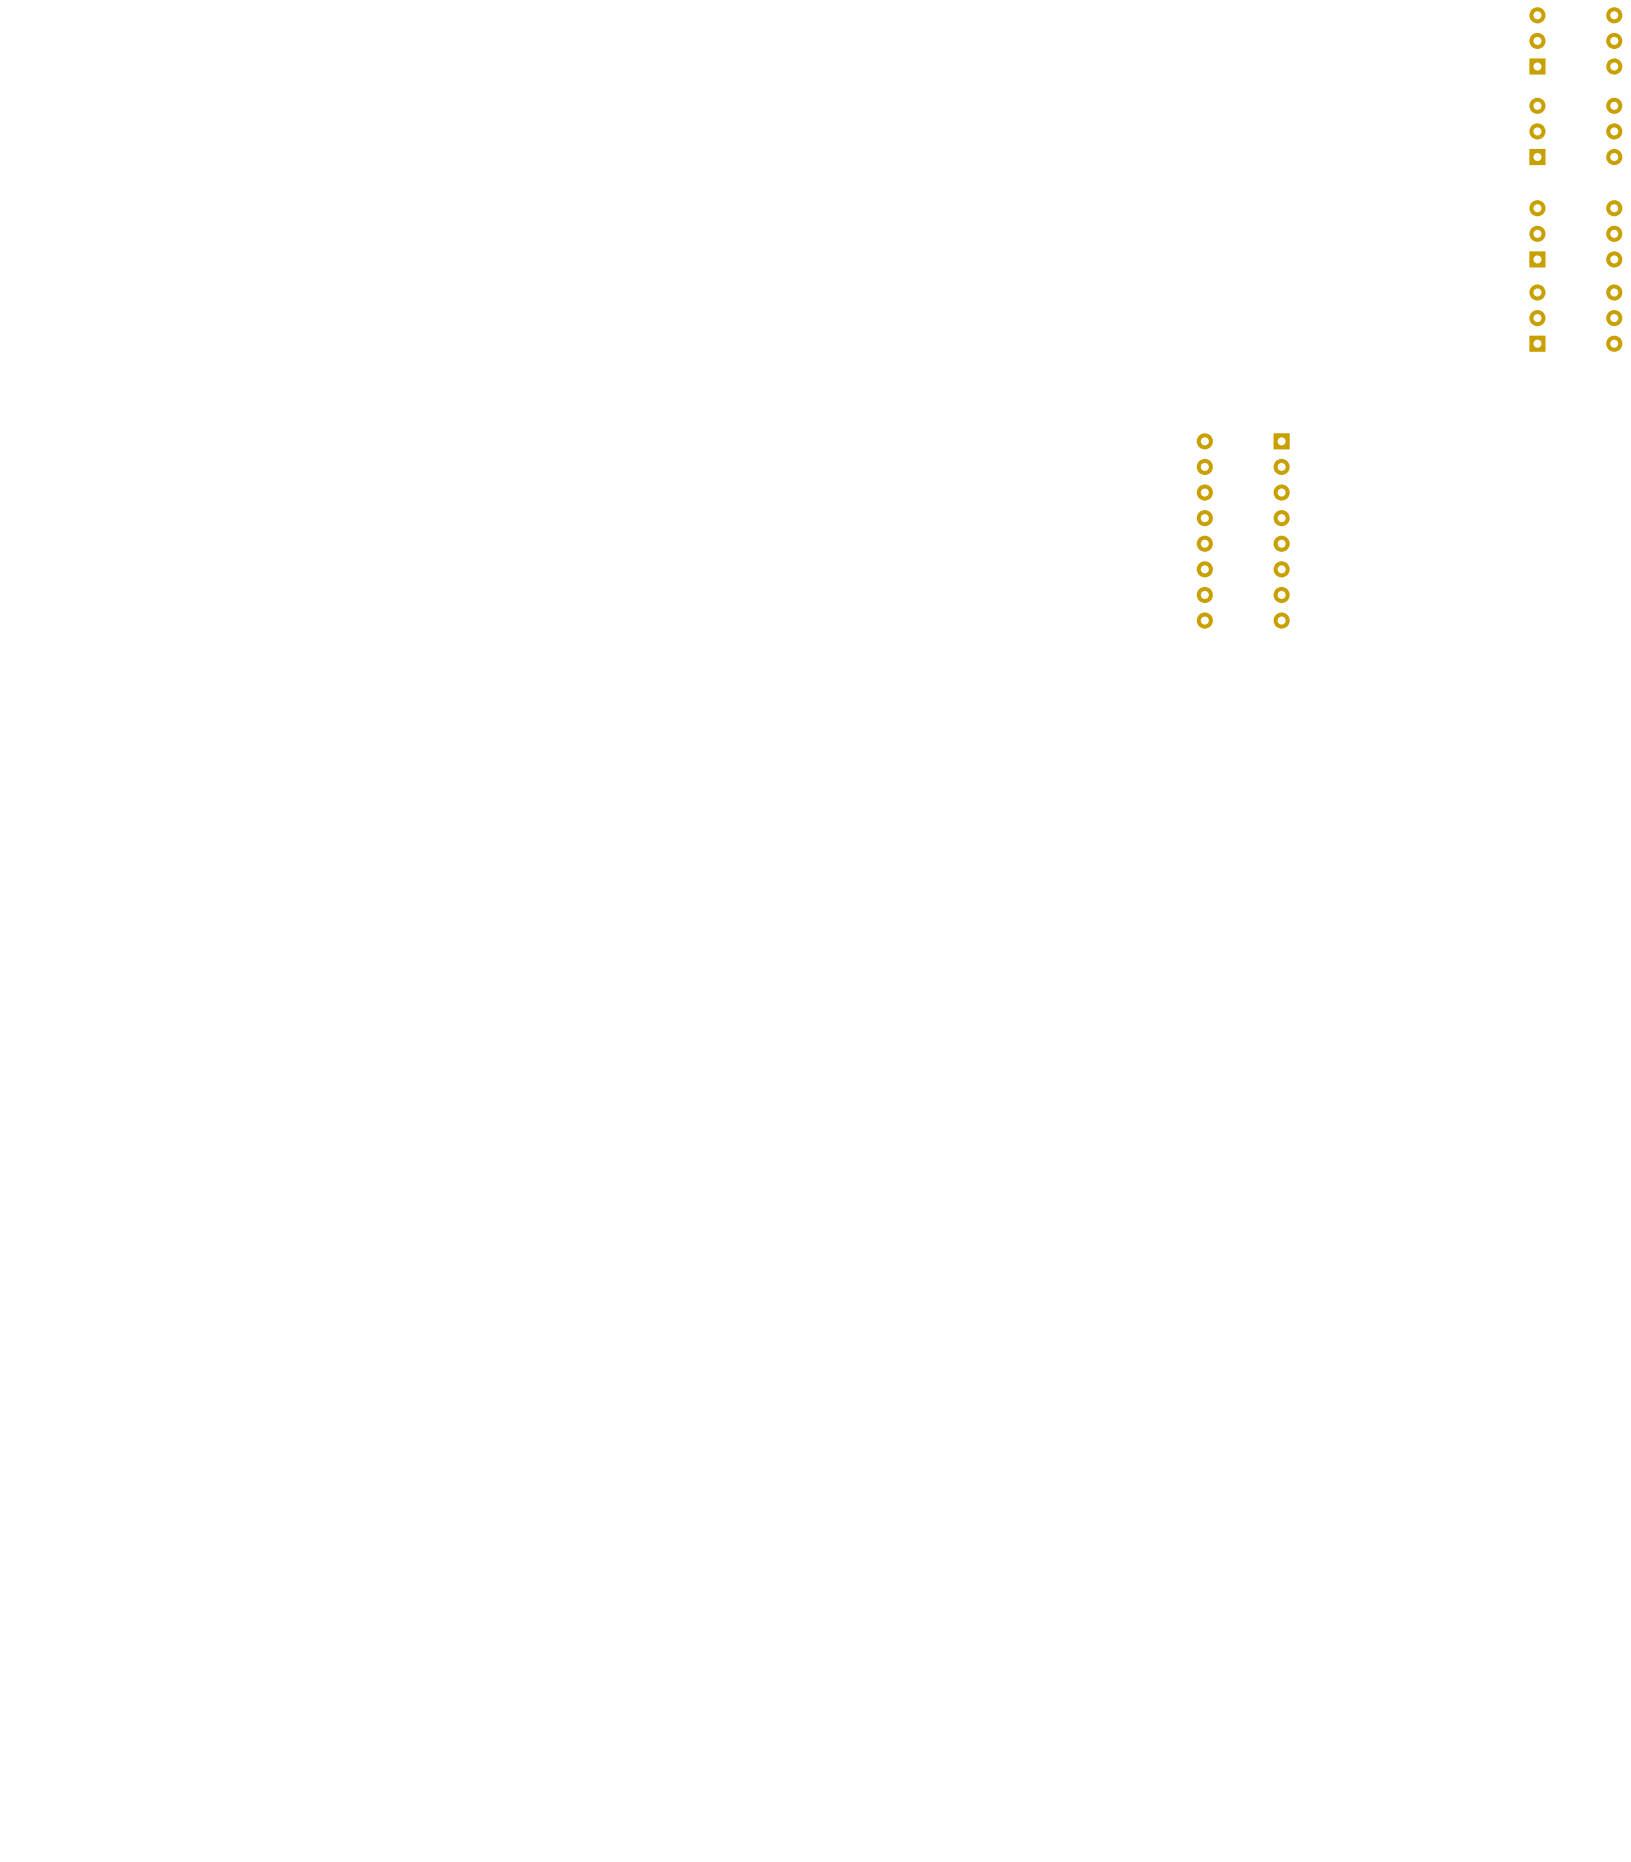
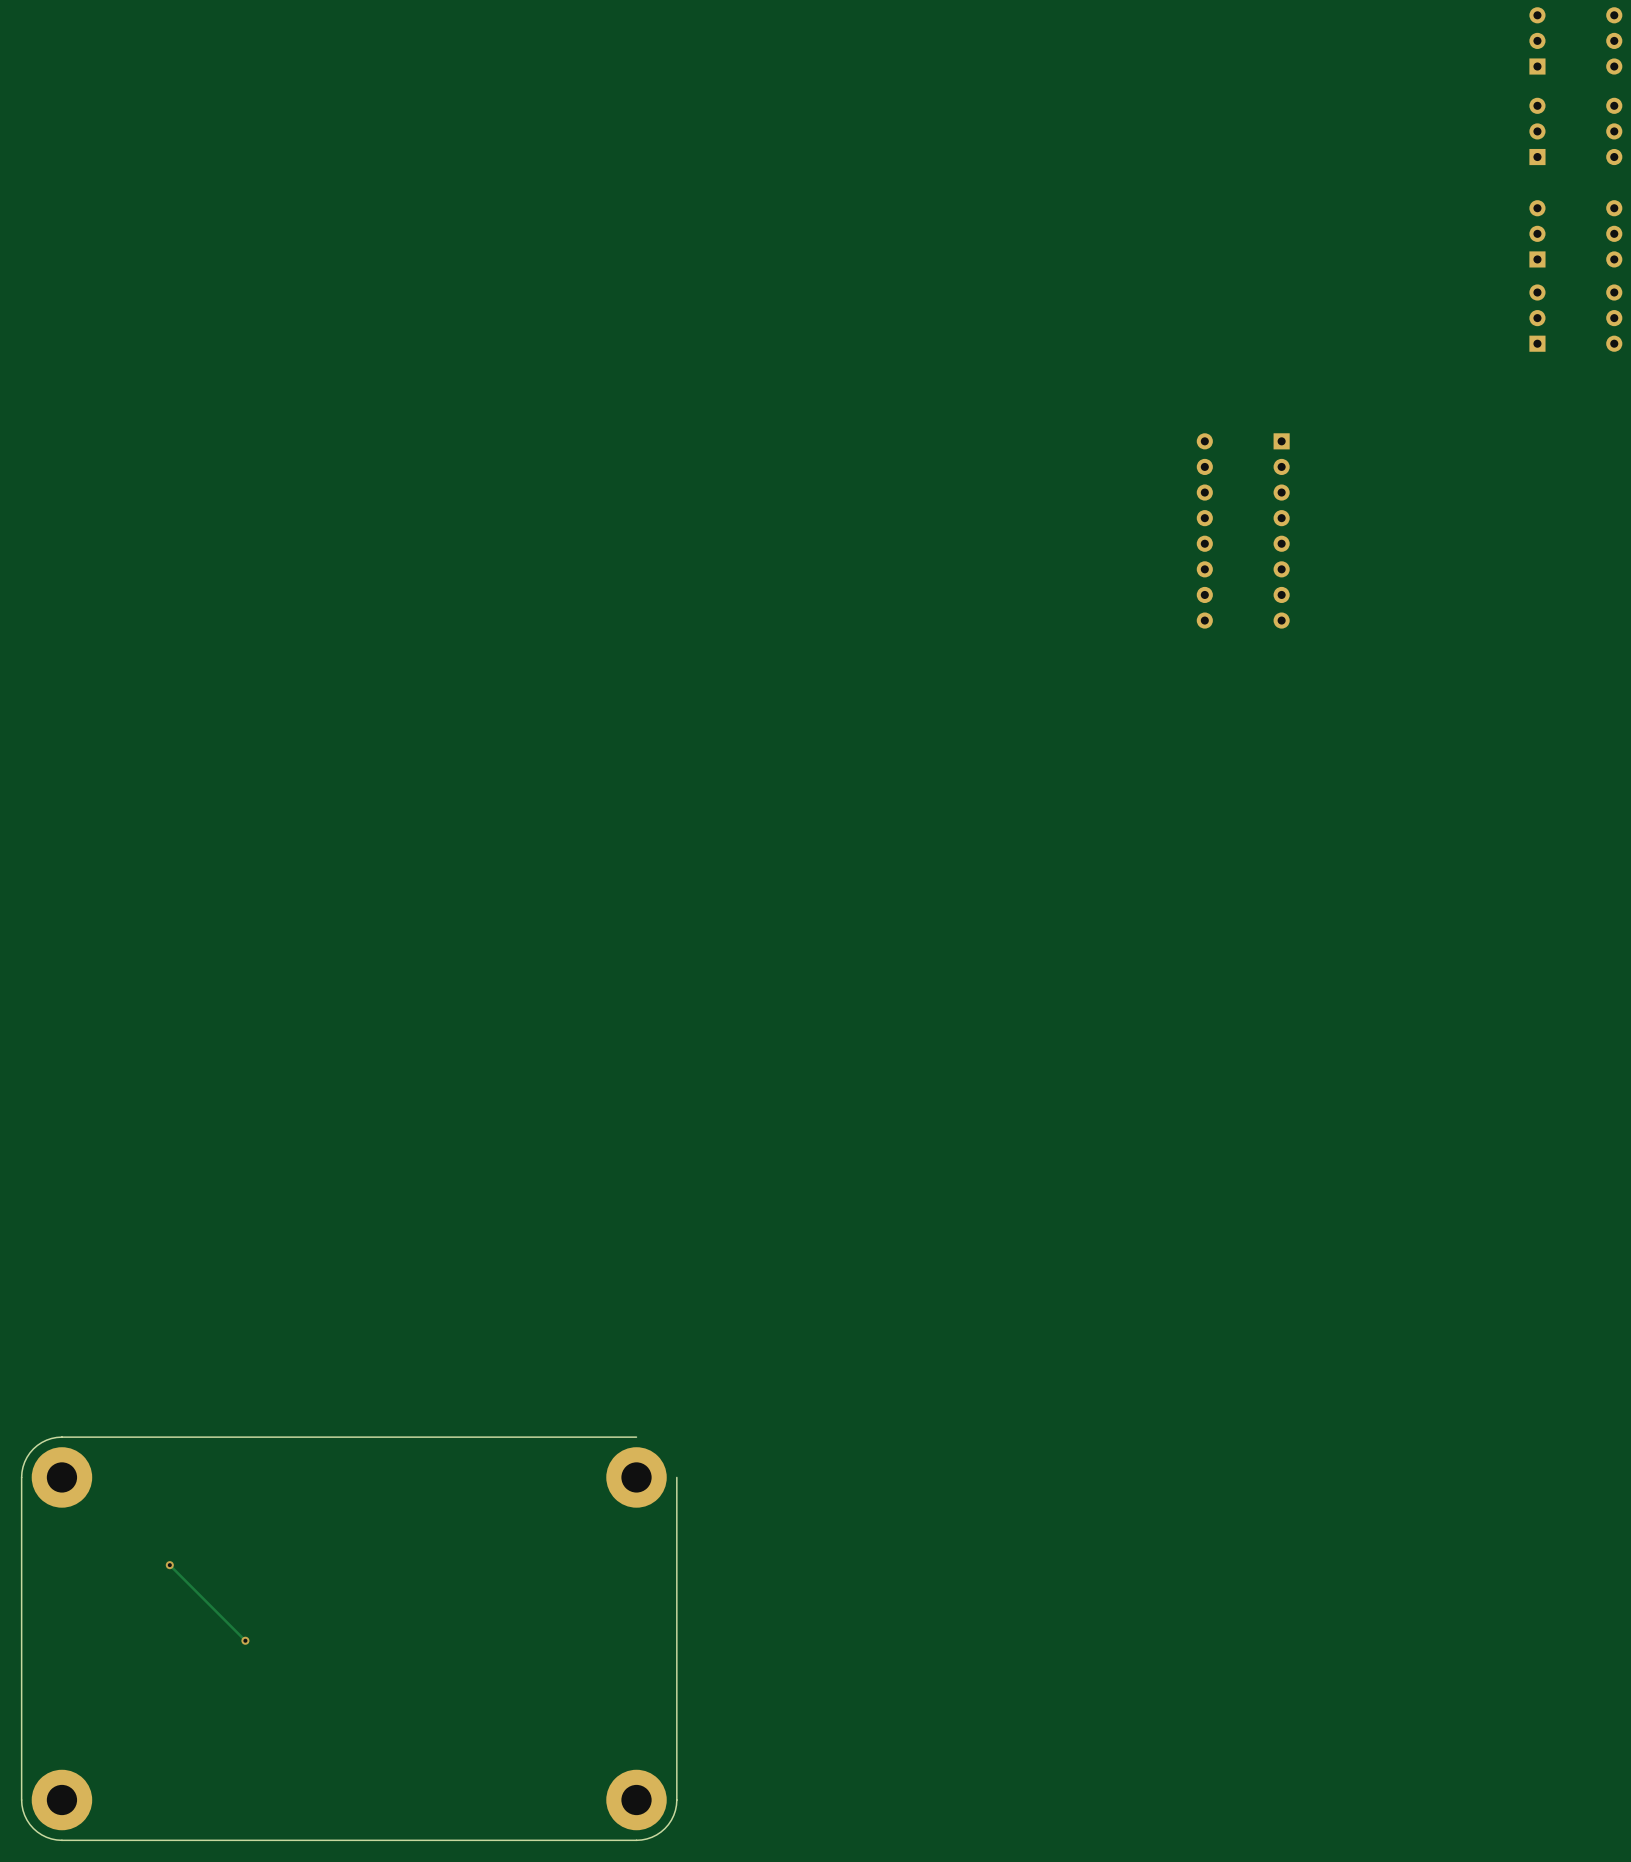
board edge: none -> (636, 1437) (61, 1437) (41, 1442) (27, 1457) (21, 1477) (21, 1800) (27, 1820) (41, 1834) (61, 1840) (636, 1840) (656, 1834) (671, 1820) (676, 1800) (676, 1477)
part: none -> (61, 1477)
part: none -> (636, 1477)
track: none -> (169, 1565) (245, 1640)
via: none -> (169, 1565)
via: none -> (245, 1640)
part: none -> (61, 1800)
part: none -> (636, 1800)

